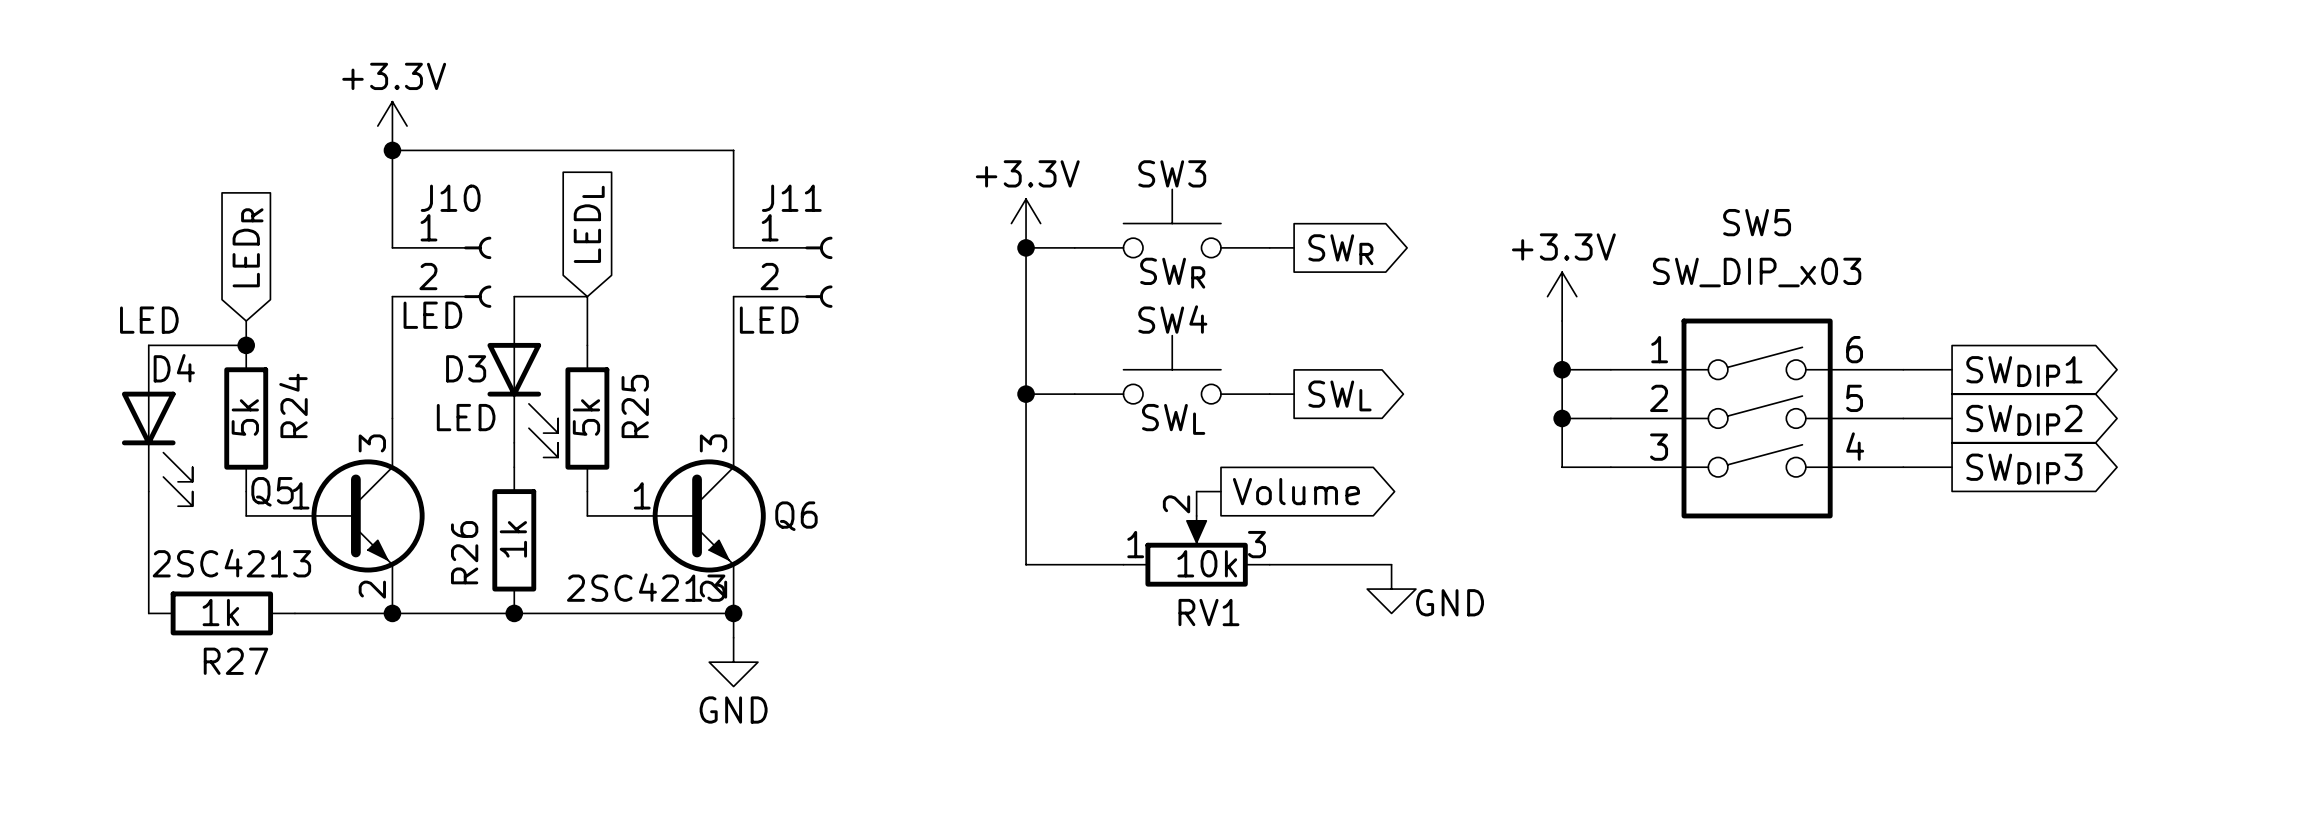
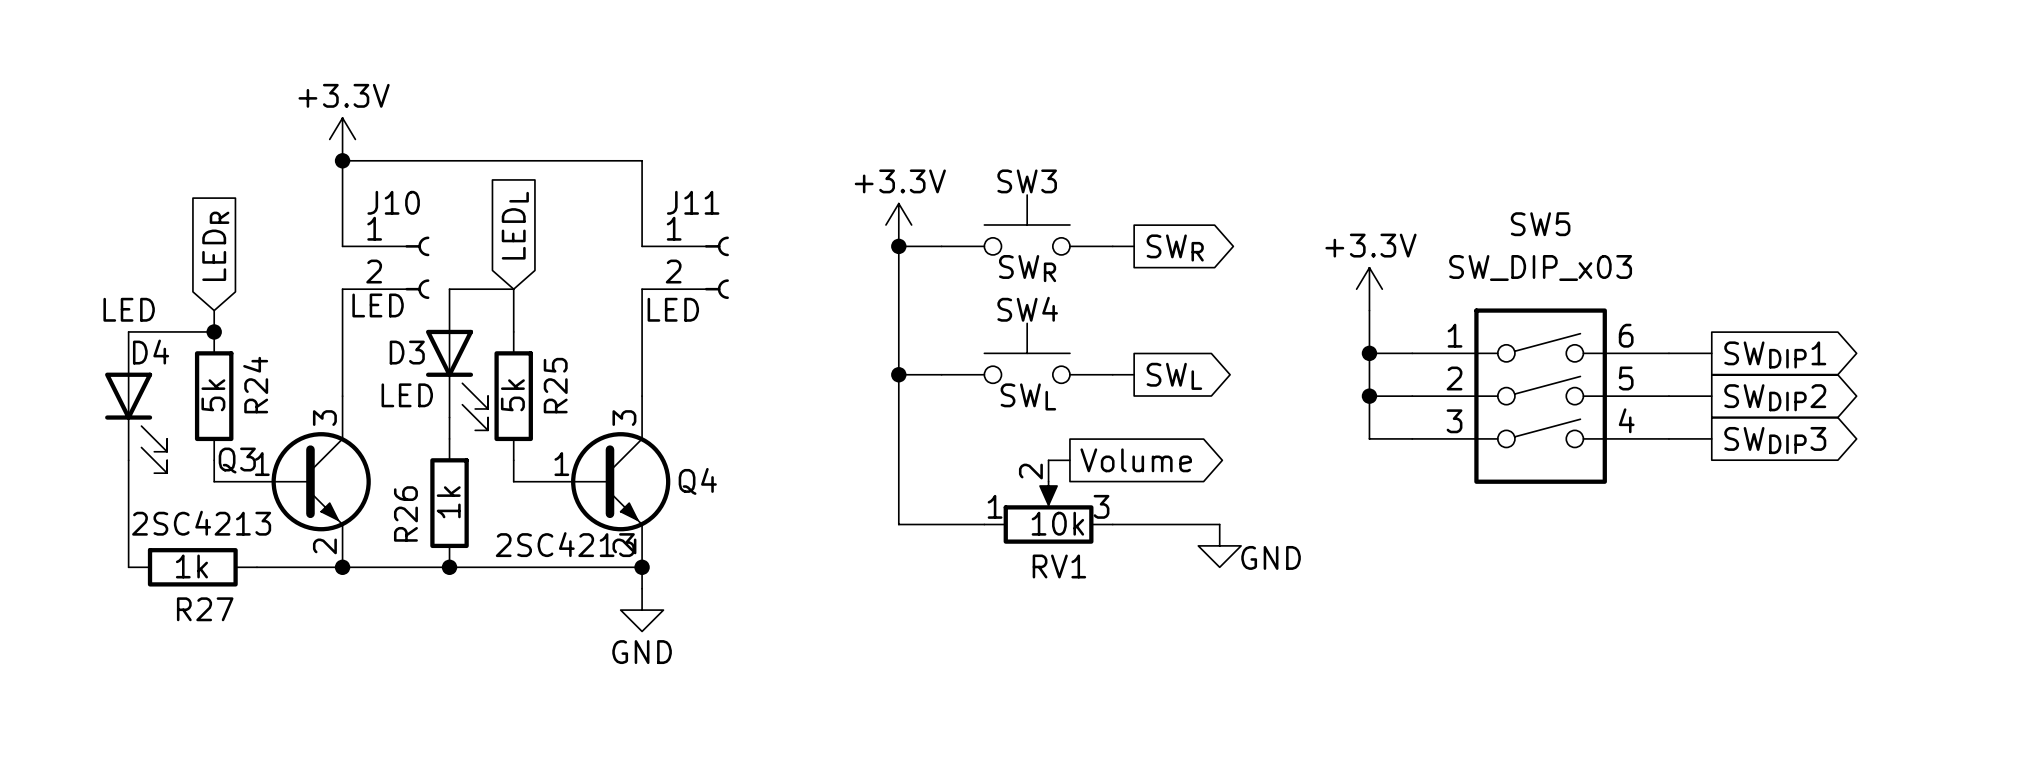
Q5 name: Q5 (272, 491) -> Q3 (237, 460)
Q6 name: Q6 (796, 516) -> Q4 (697, 481)

